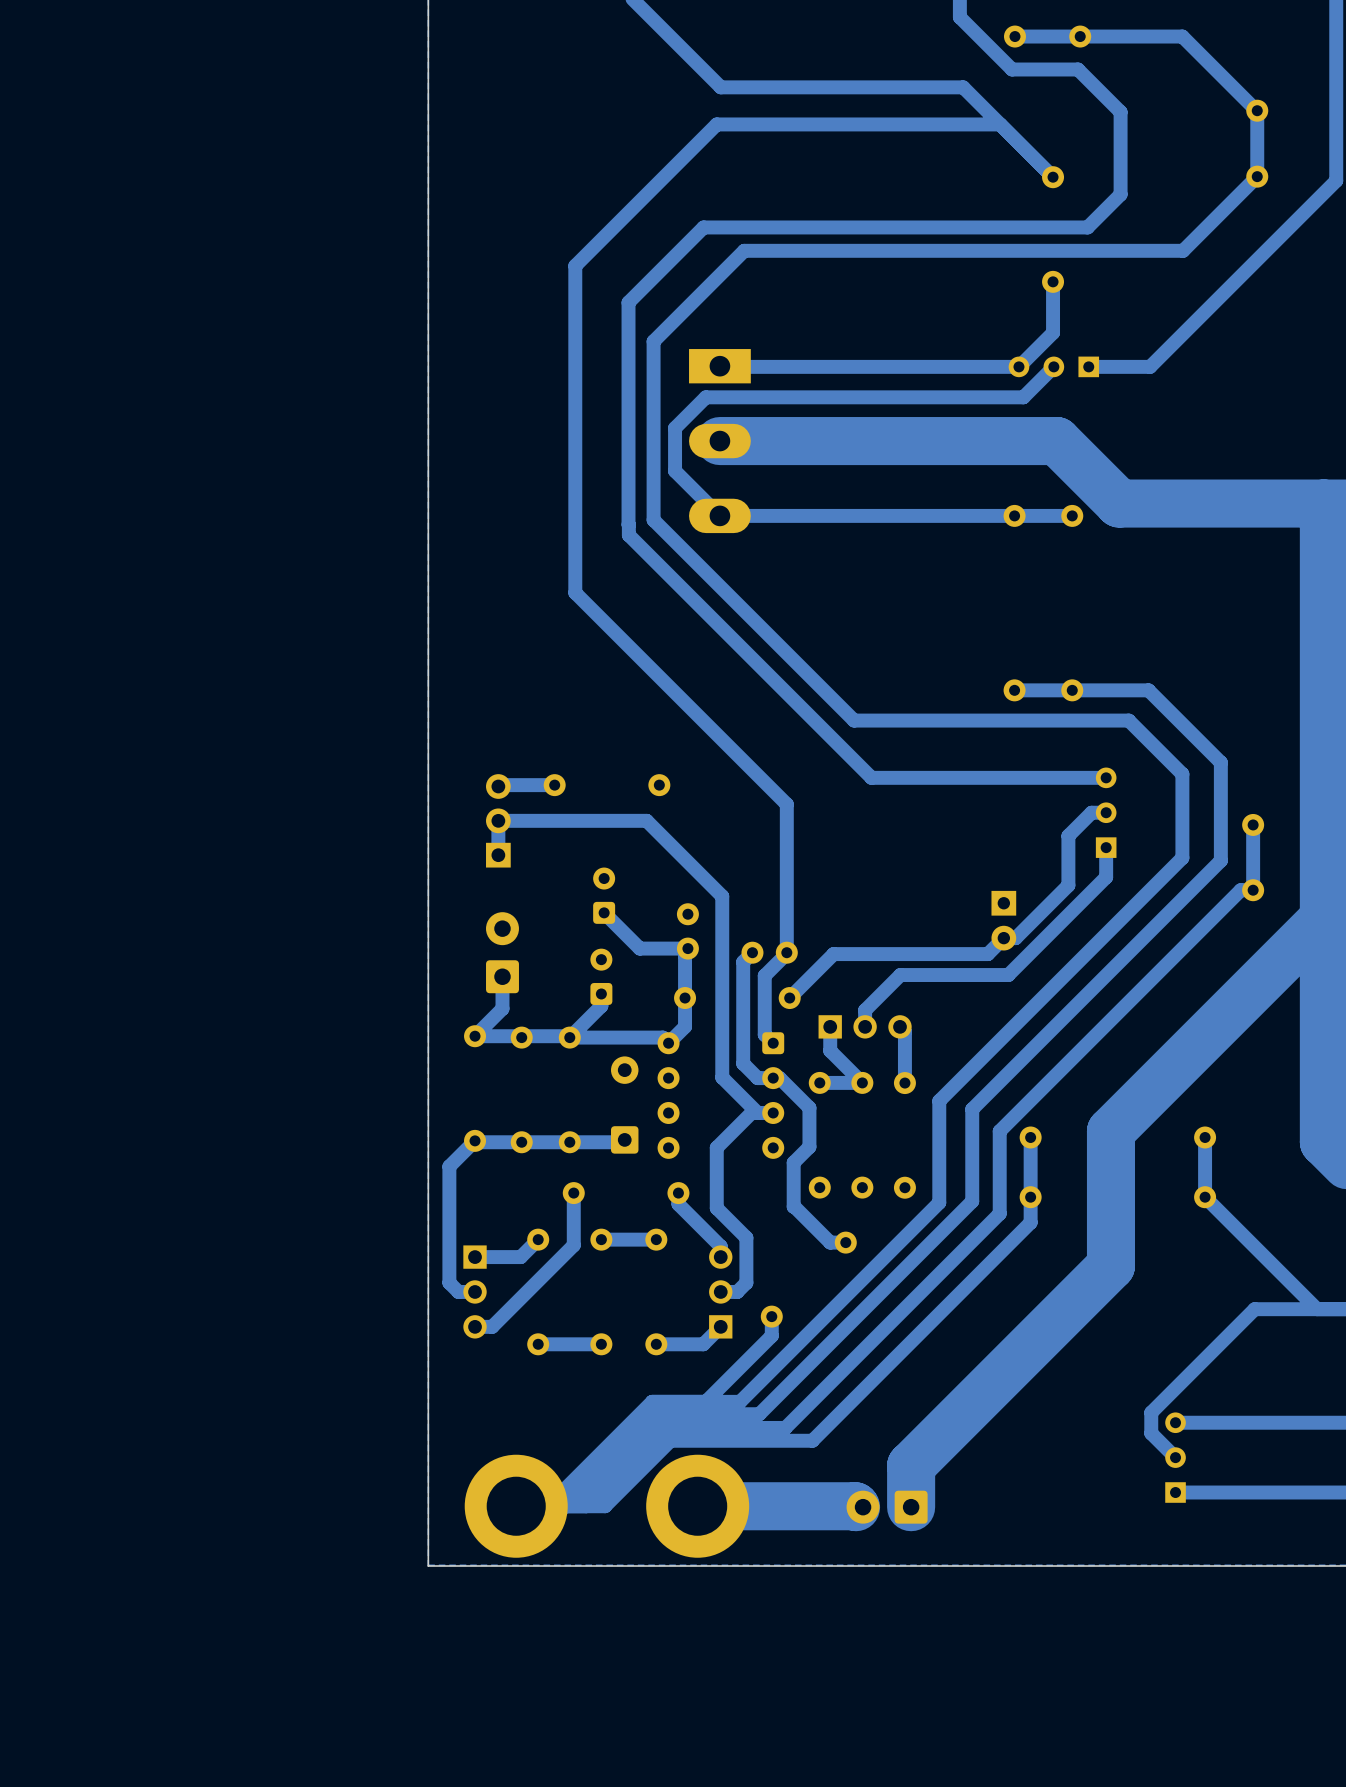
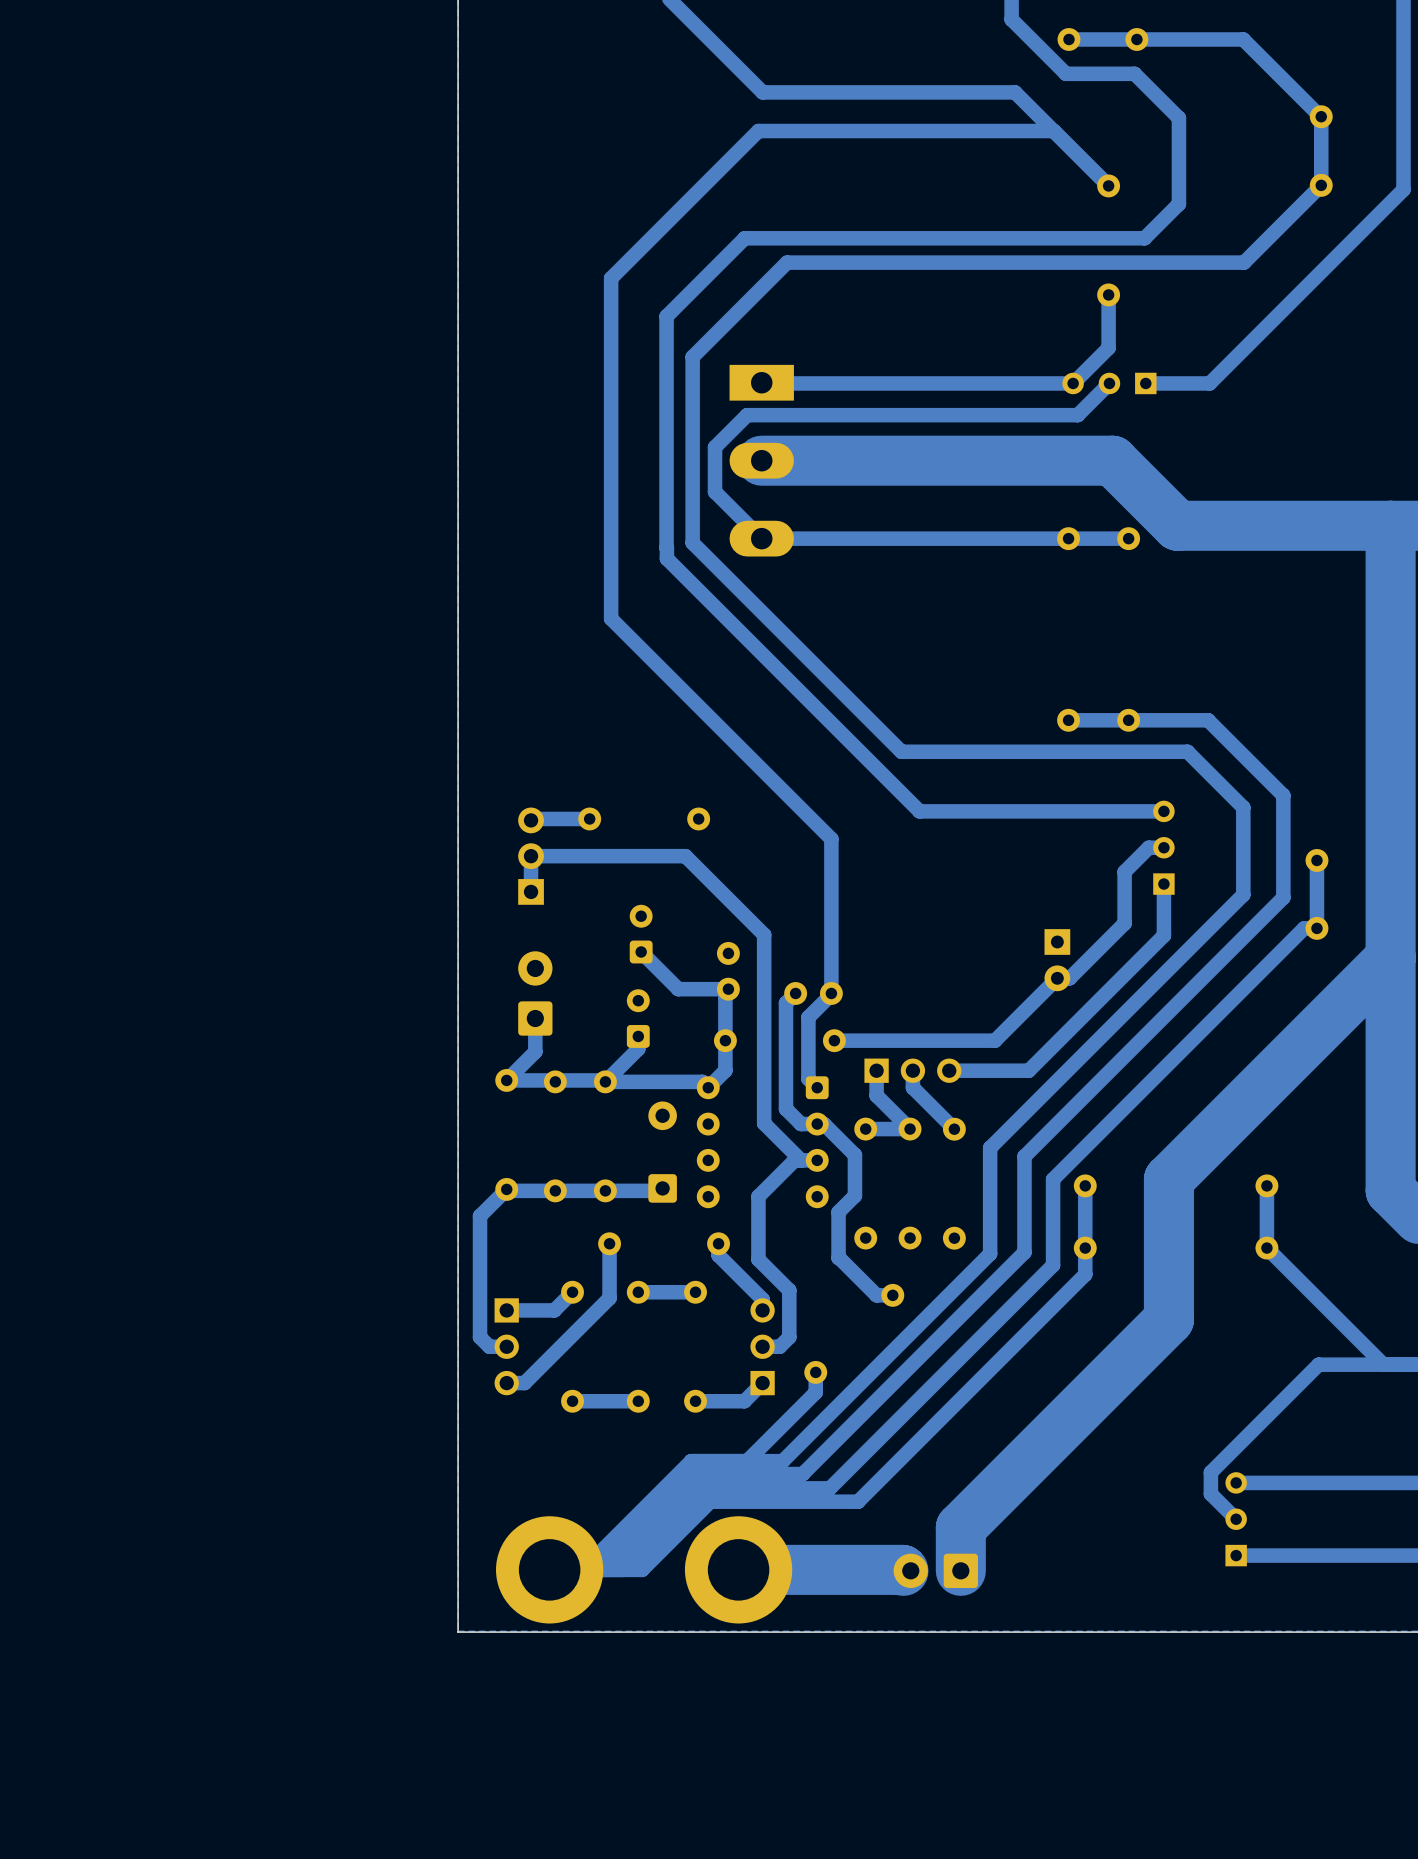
track: (1106, 877) (1008, 975) (900, 975) (865, 1010) (865, 1026) -> (1163, 914) (1163, 935) (1028, 1070) (949, 1070)
track: (987, 954) (833, 954) (789, 998) -> (1040, 994) (995, 1040) (834, 1040)
track: (900, 1026) (904, 1031) (904, 1083) -> (912, 1070) (912, 1087) (954, 1129)

